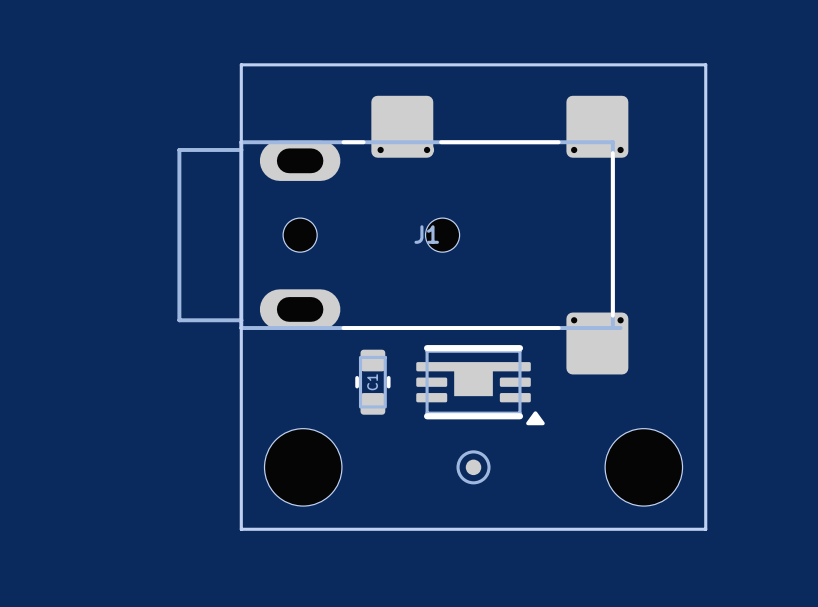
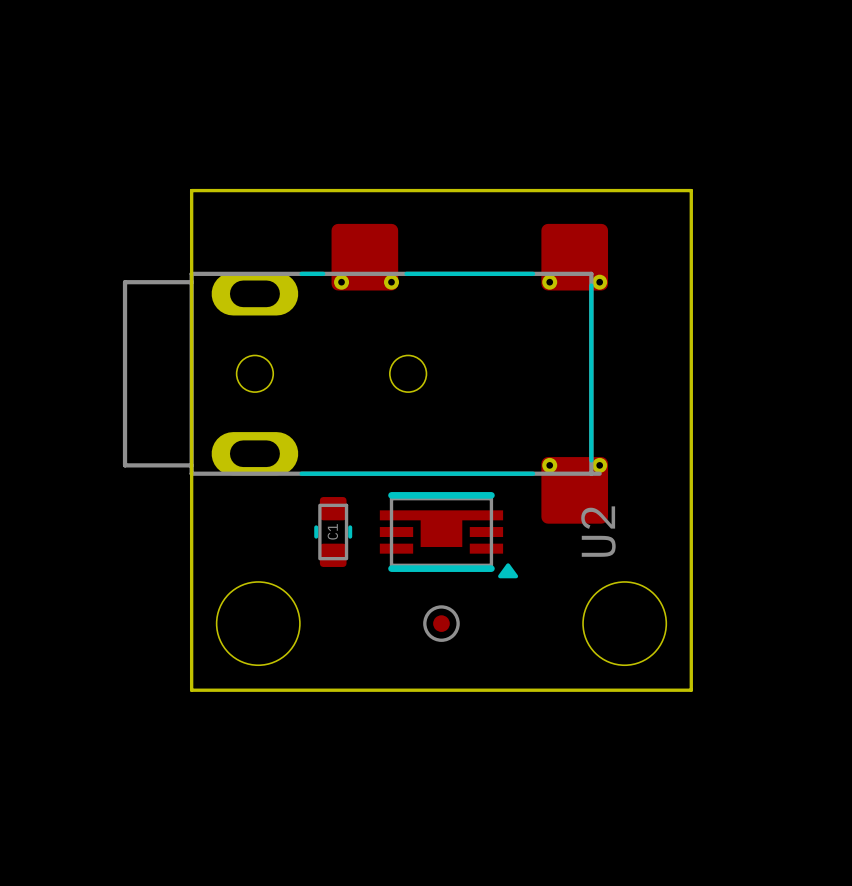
J1 name: J1 (426, 234) -> none
part: (480, 385) -> none
U2: none -> (448, 535)

